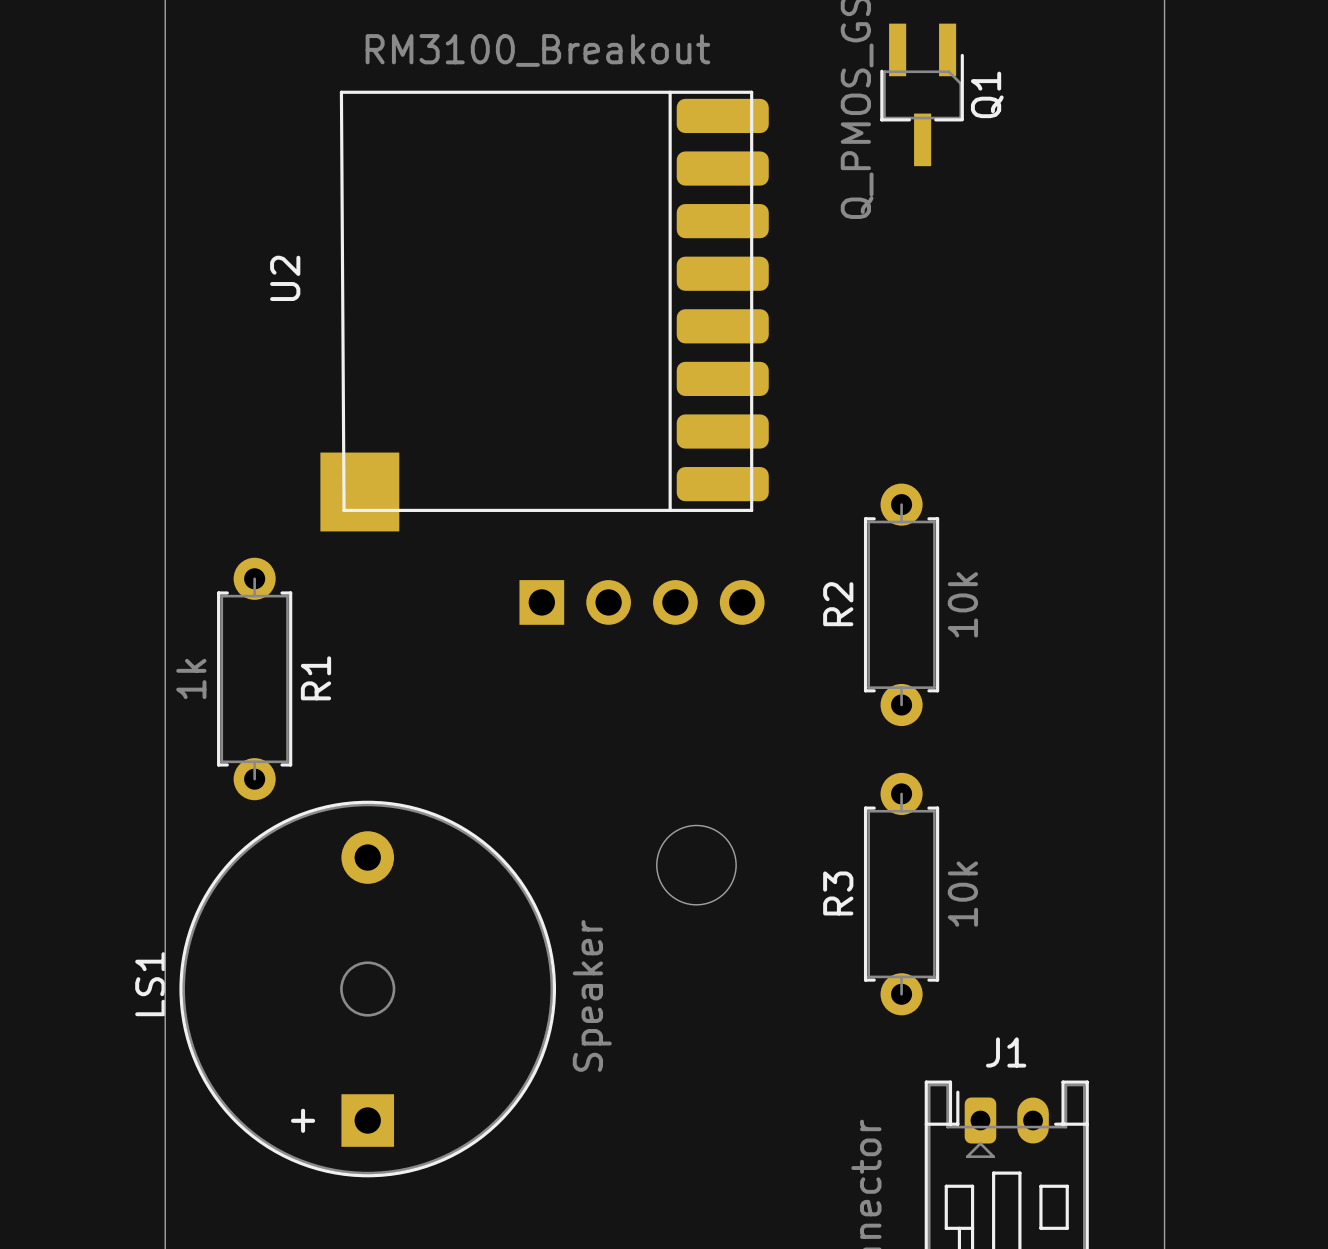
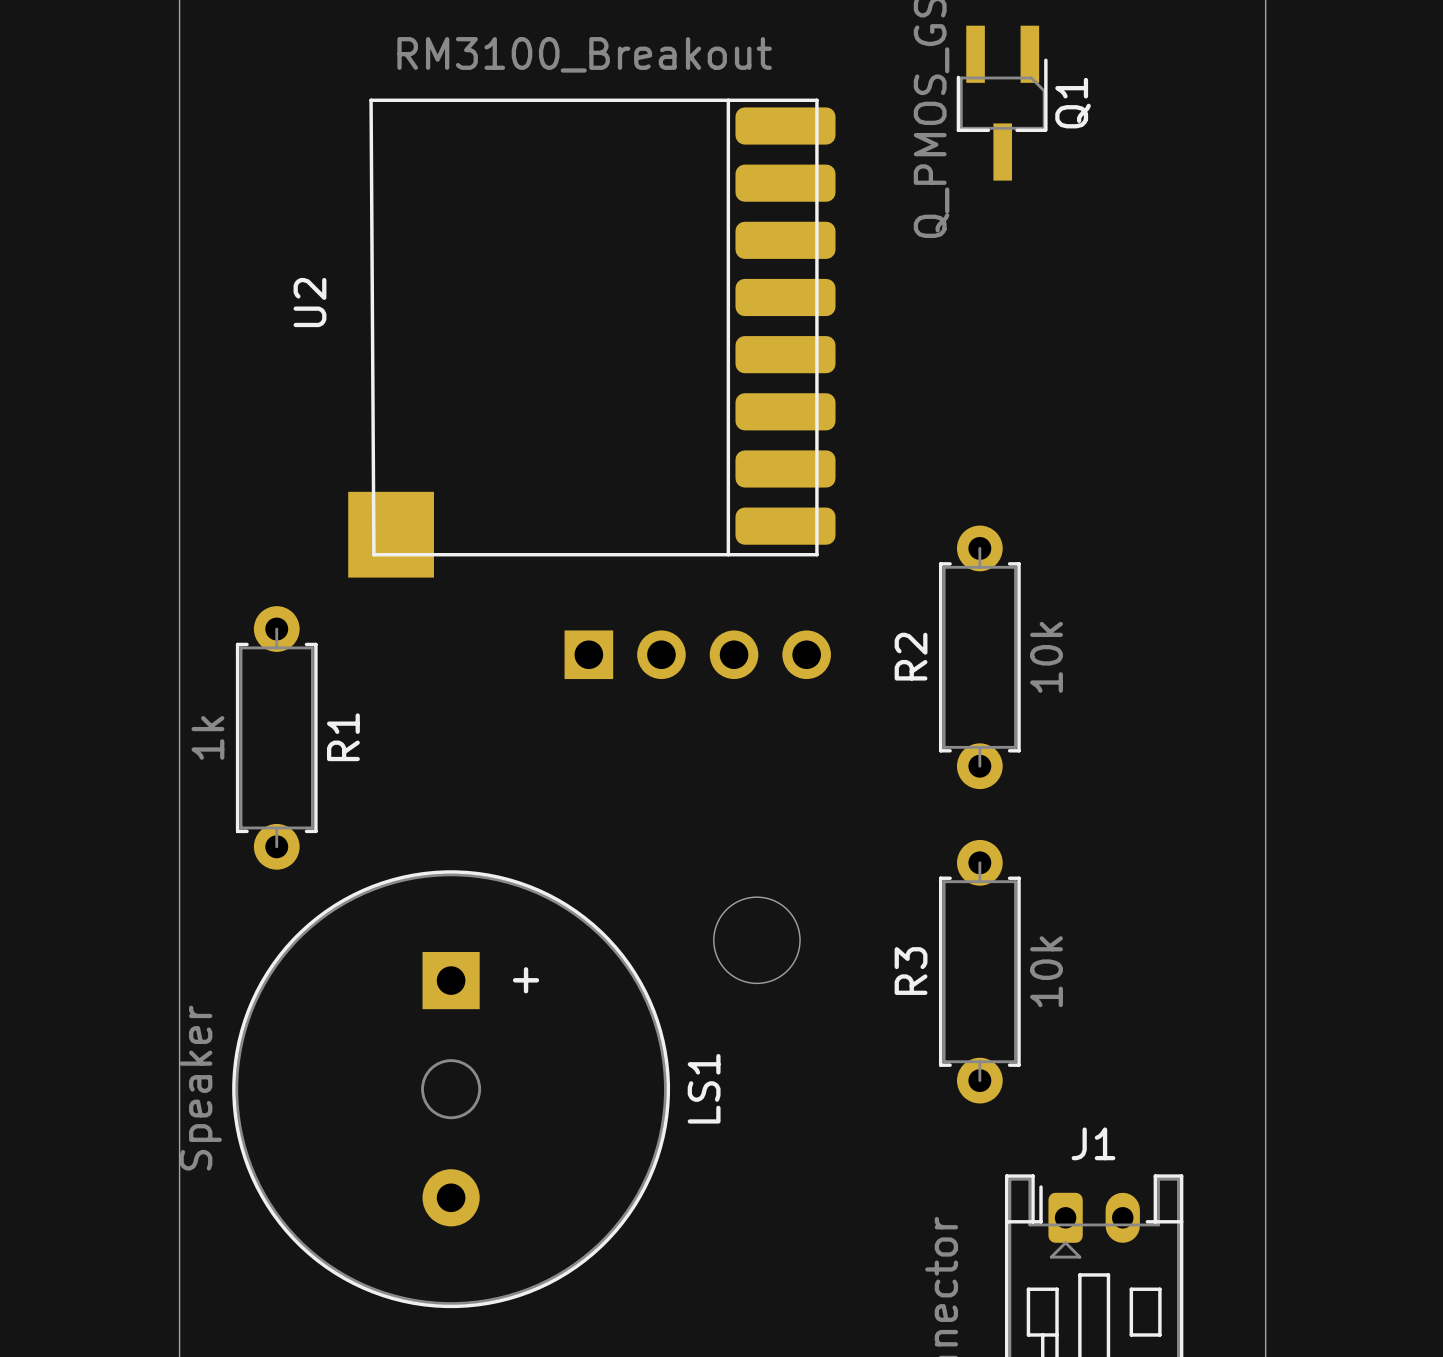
LS1 footprint: [179, 800, 557, 1178] -> [232, 870, 671, 1309]
LS1 name position: LS1 (150, 984) -> LS1 (704, 1088)
LS1 value position: Speaker (592, 995) -> Speaker (200, 1088)

